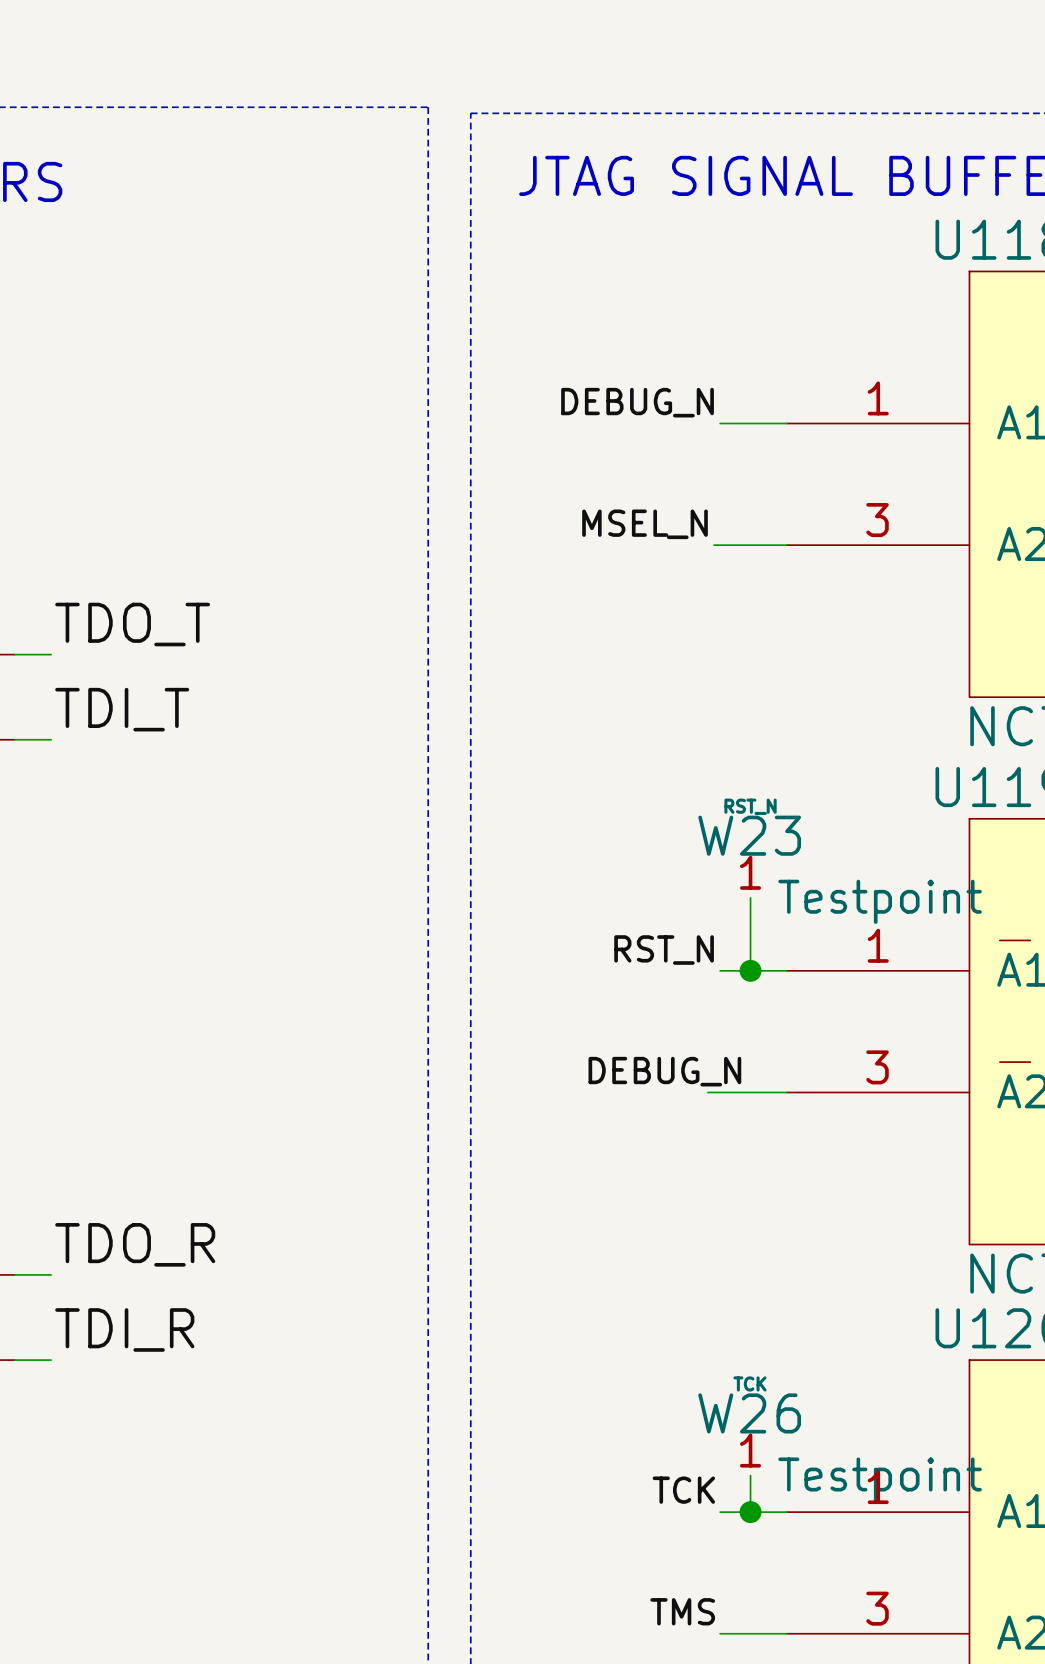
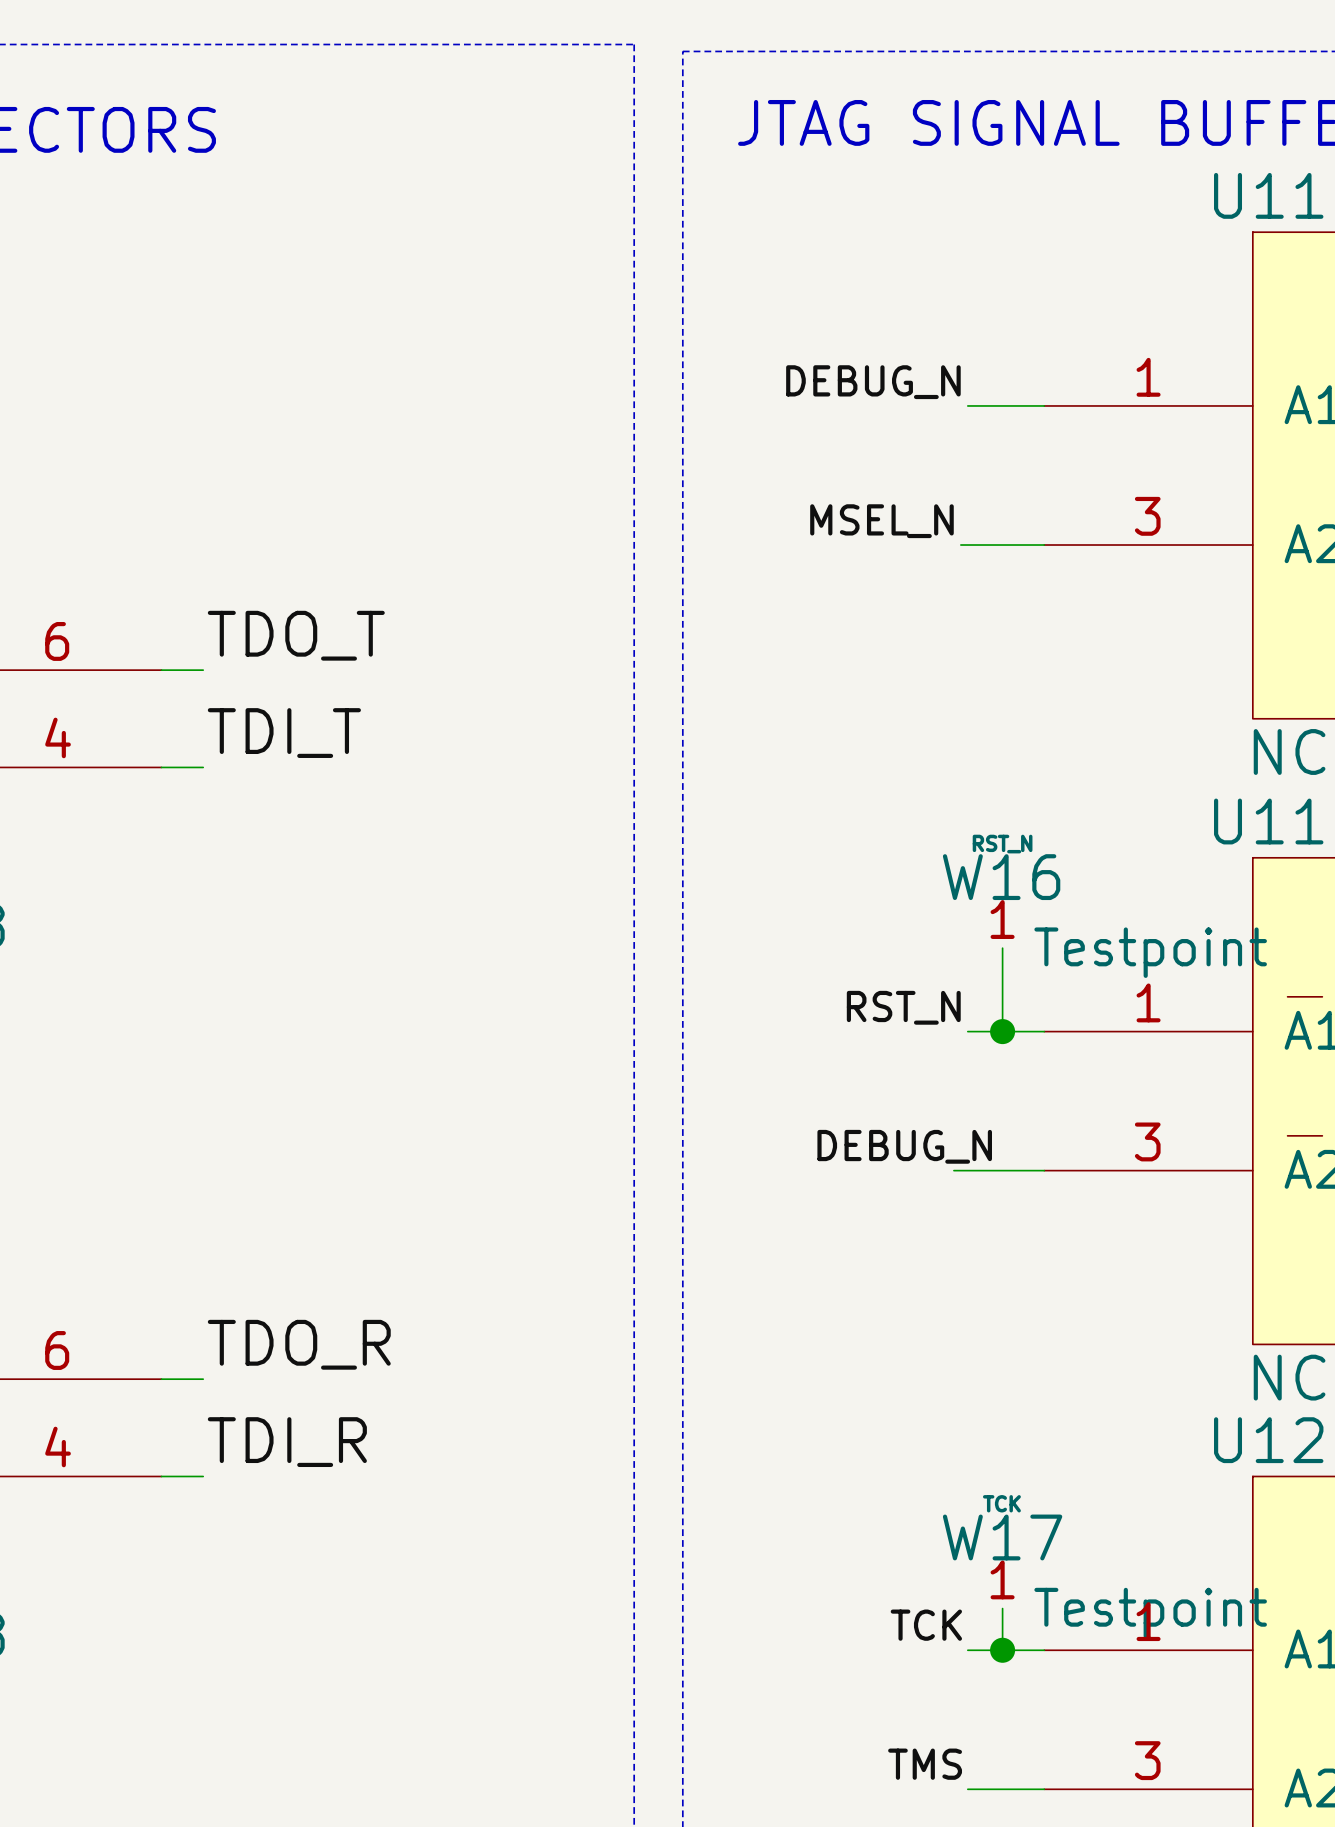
W23 name: W23 (749, 835) -> W16 (1001, 877)
W26 name: W26 (749, 1413) -> W17 (1002, 1537)

